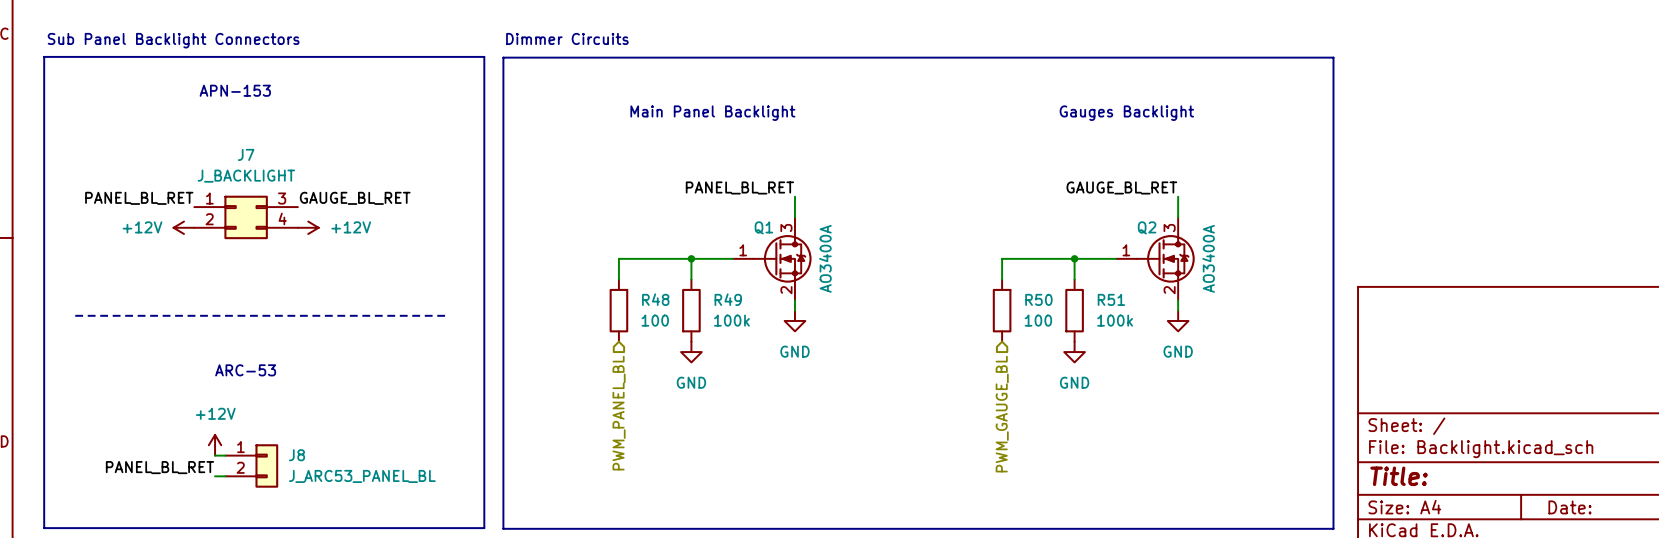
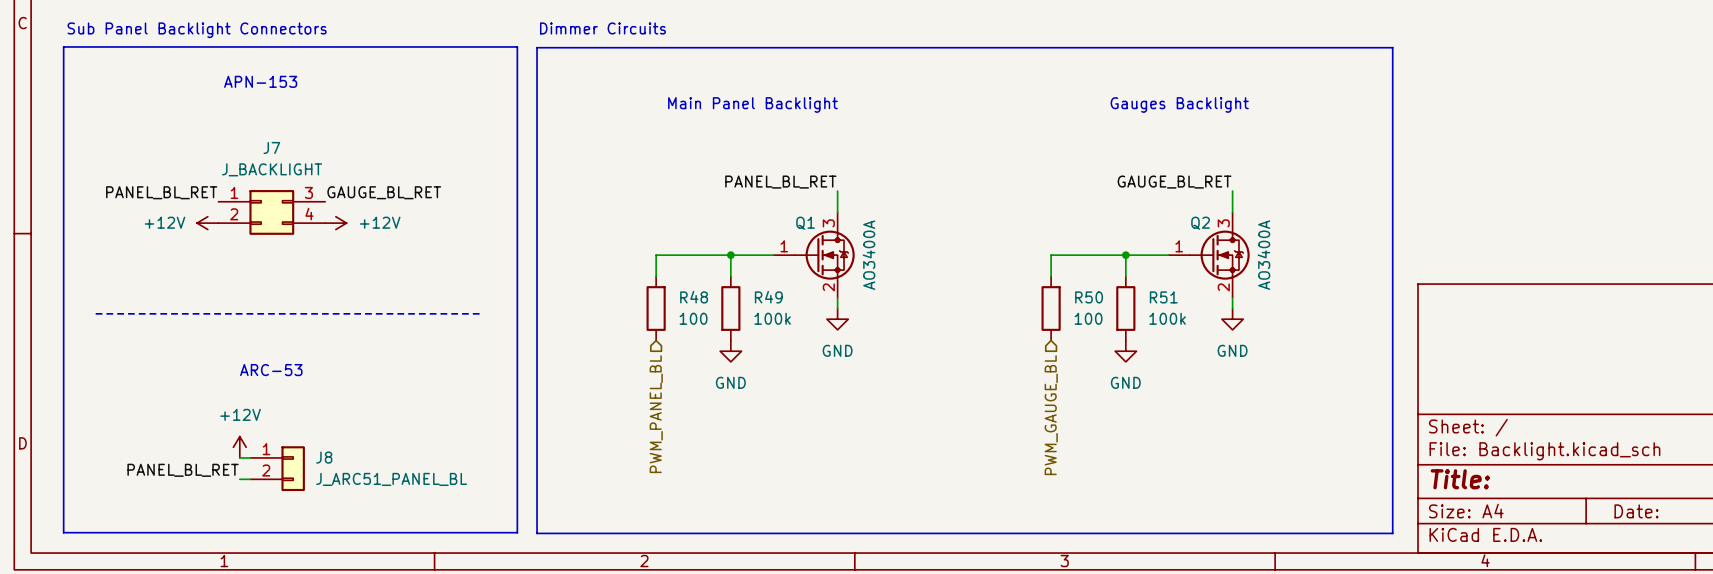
J8 value: J_ARC53_PANEL_BL (362, 476) -> J_ARC51_PANEL_BL (391, 479)

